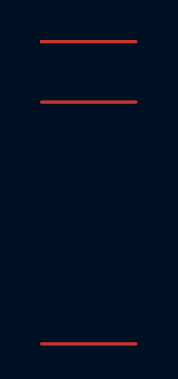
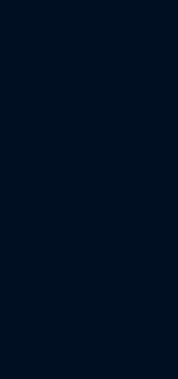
top track: (41, 41) (135, 41) -> none
top track: (41, 102) (135, 102) -> none
top track: (41, 343) (135, 343) -> none

